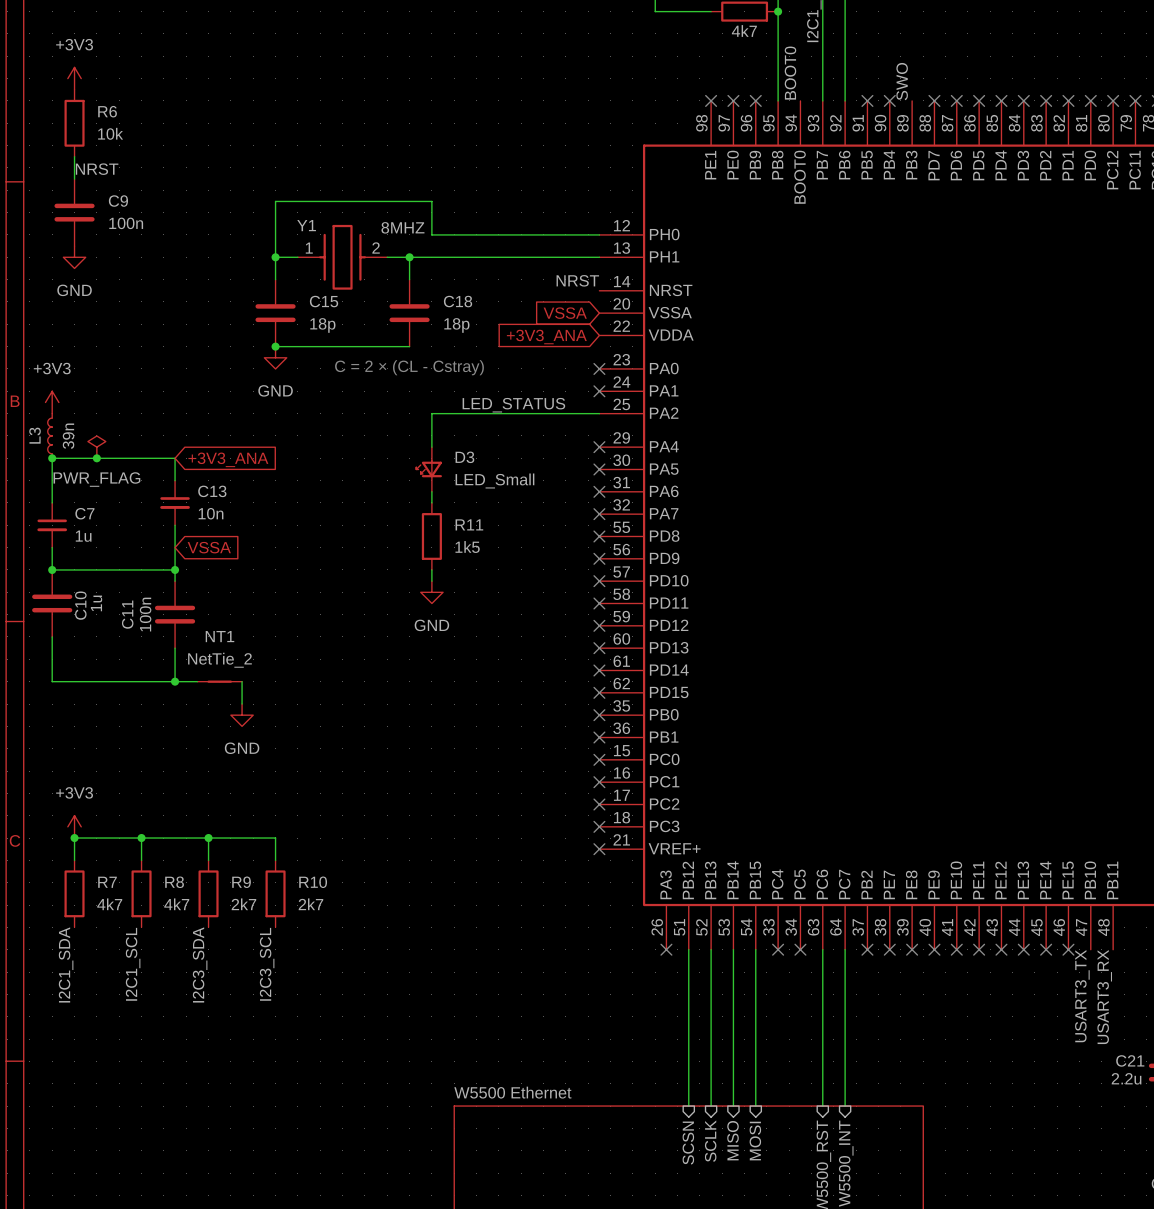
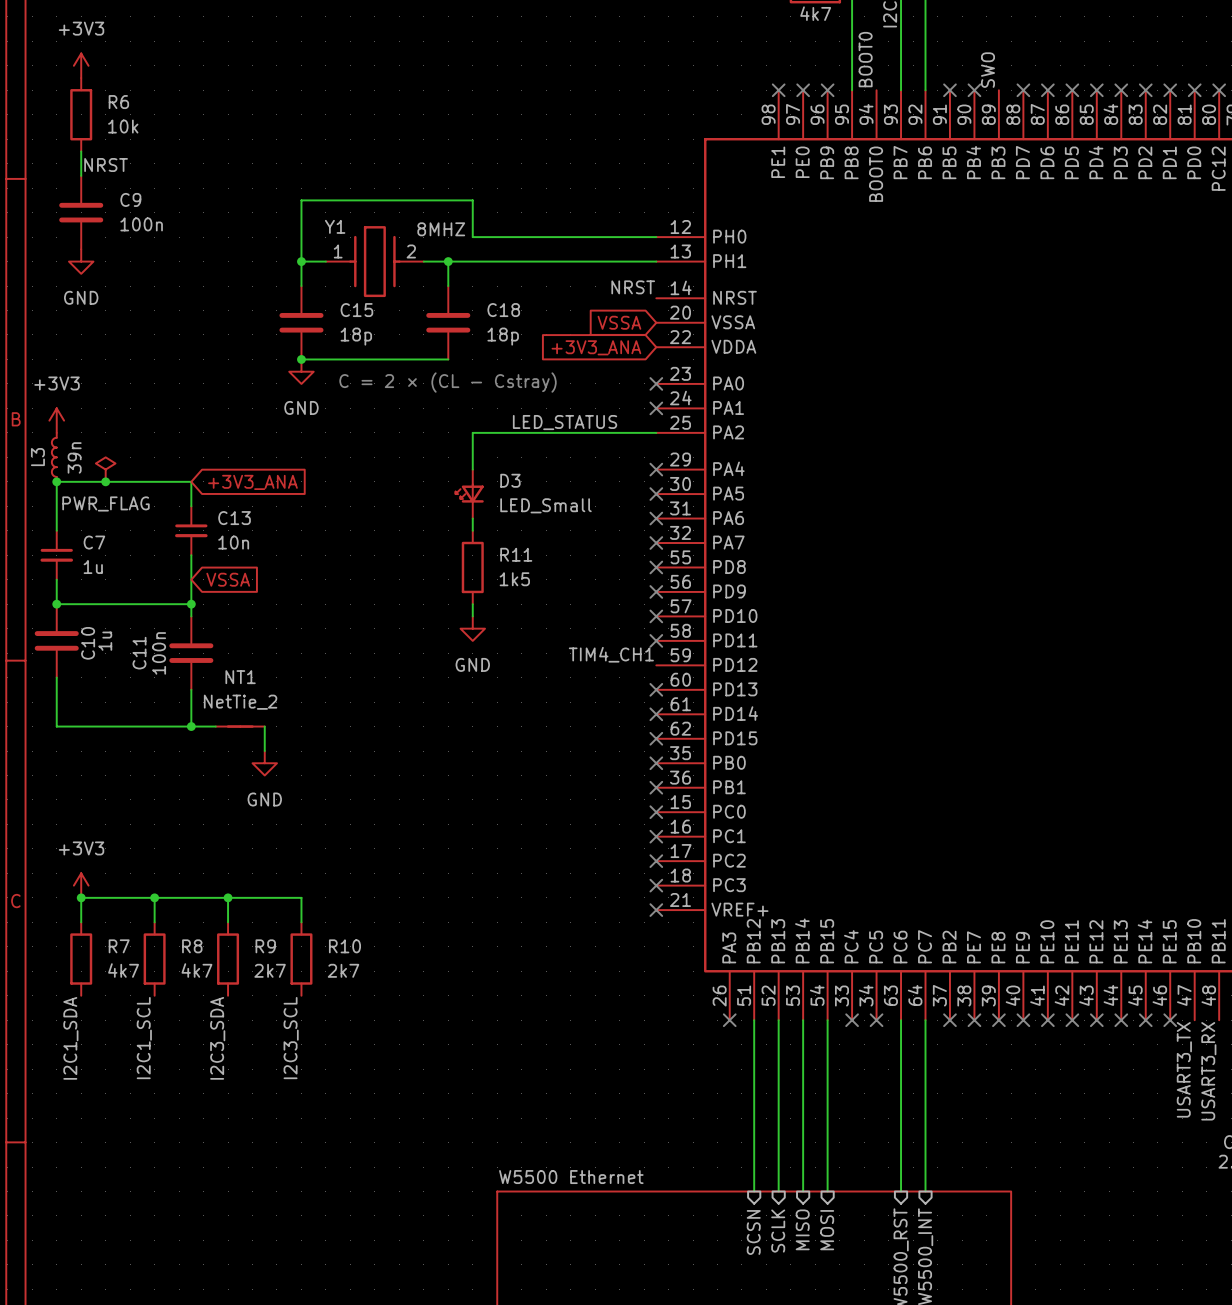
label: none -> TIM4_CH1 (611, 654)
no-connect mark: (599, 625) -> none

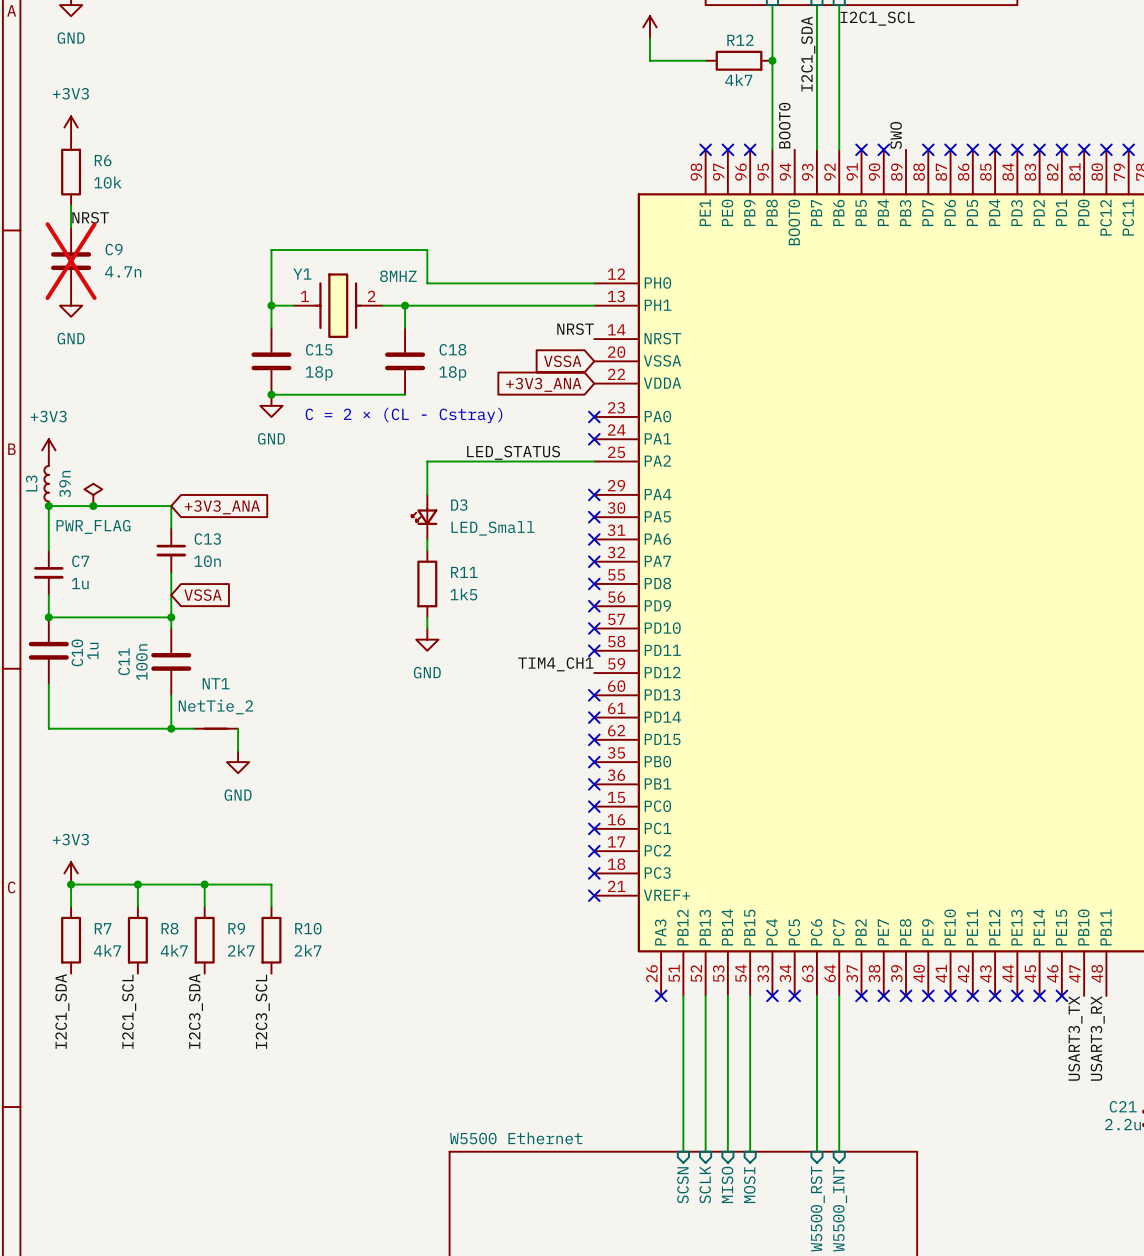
C9 do-not-place cross: none -> (71, 261)
C9 value: 100n (141, 224) -> 4.7n (123, 271)

